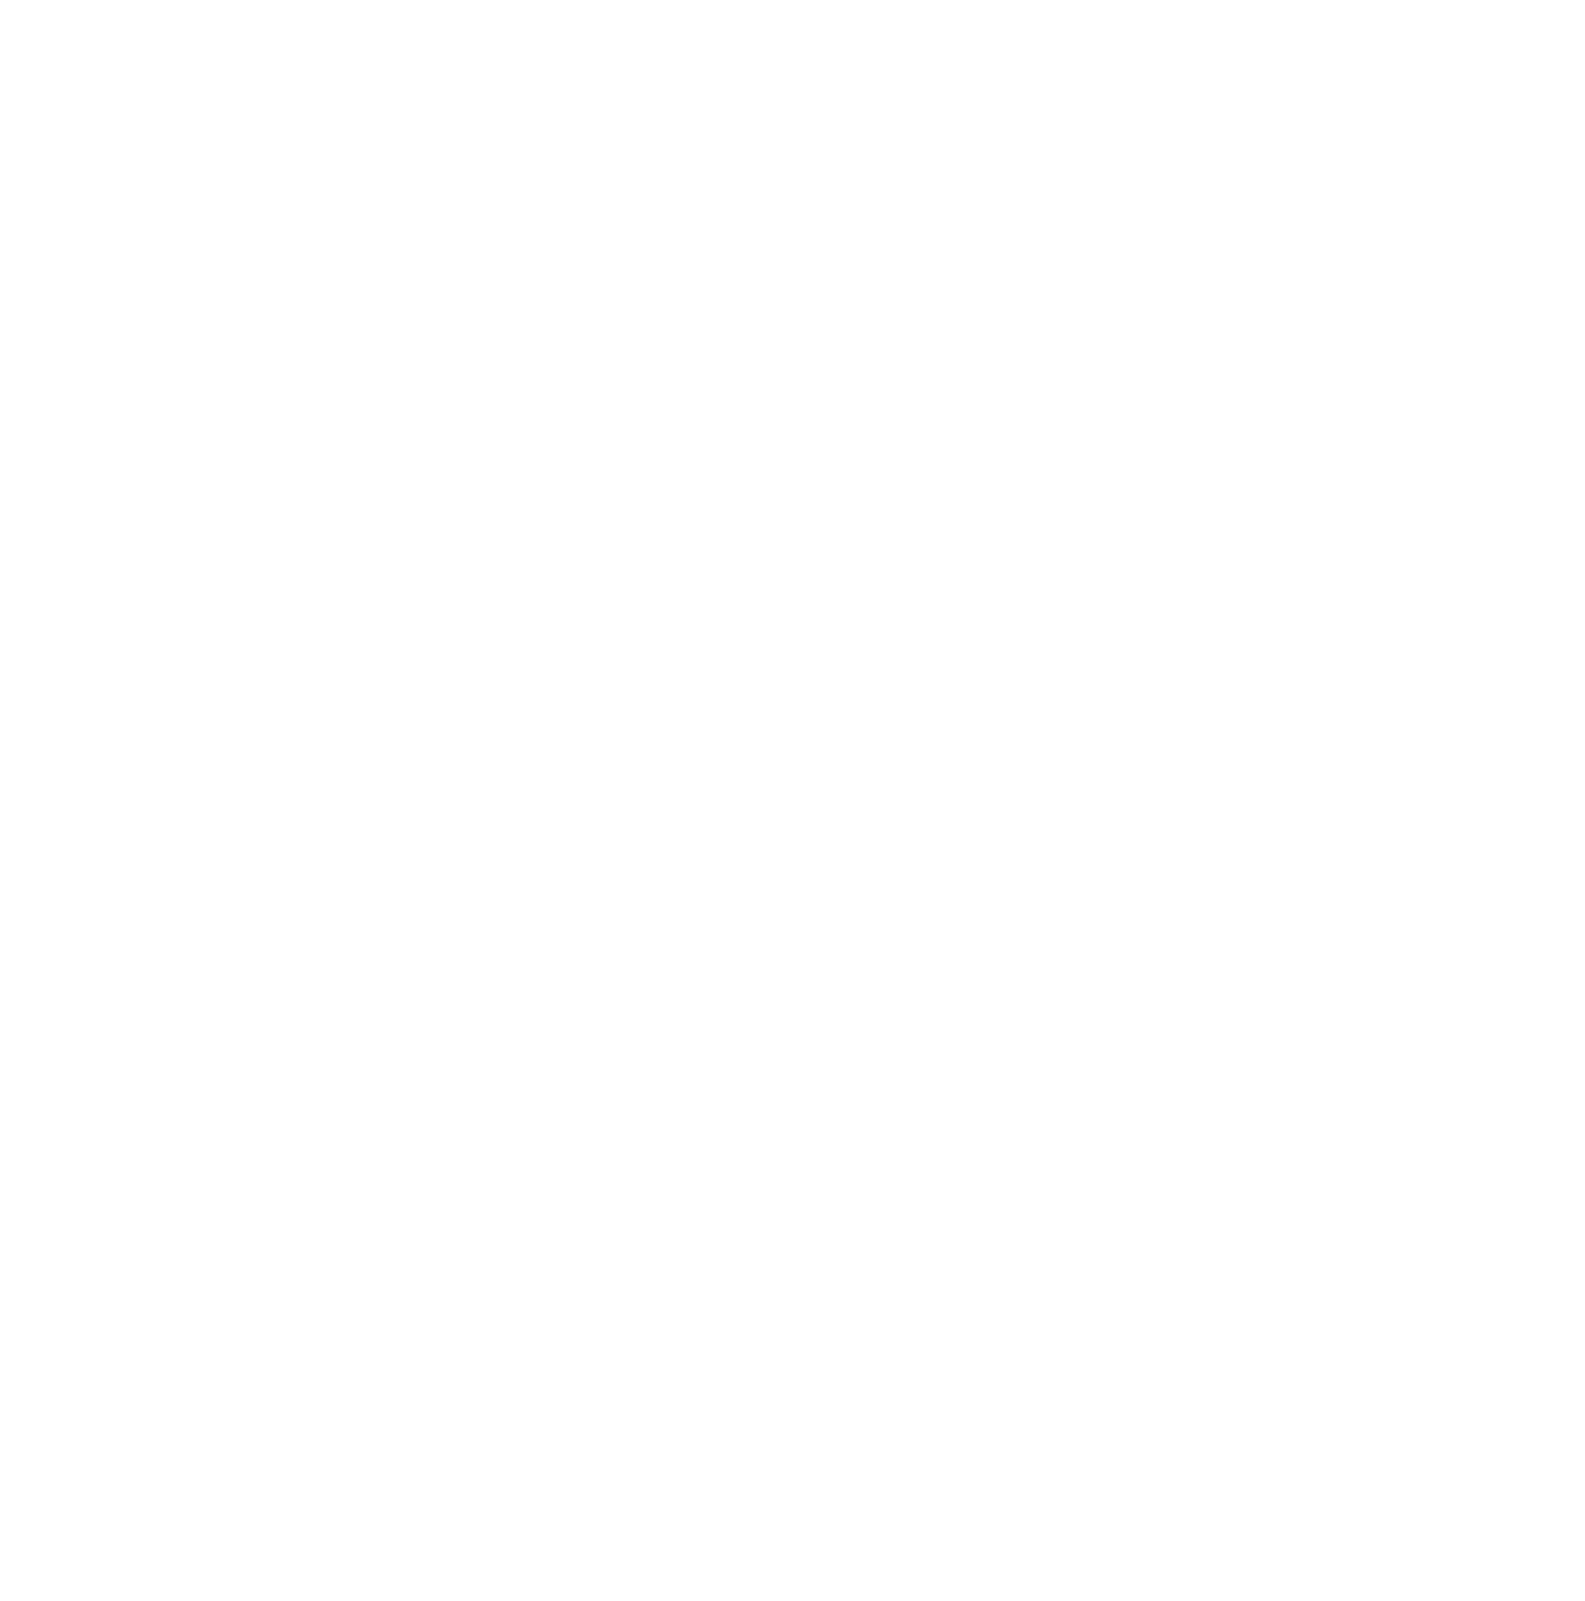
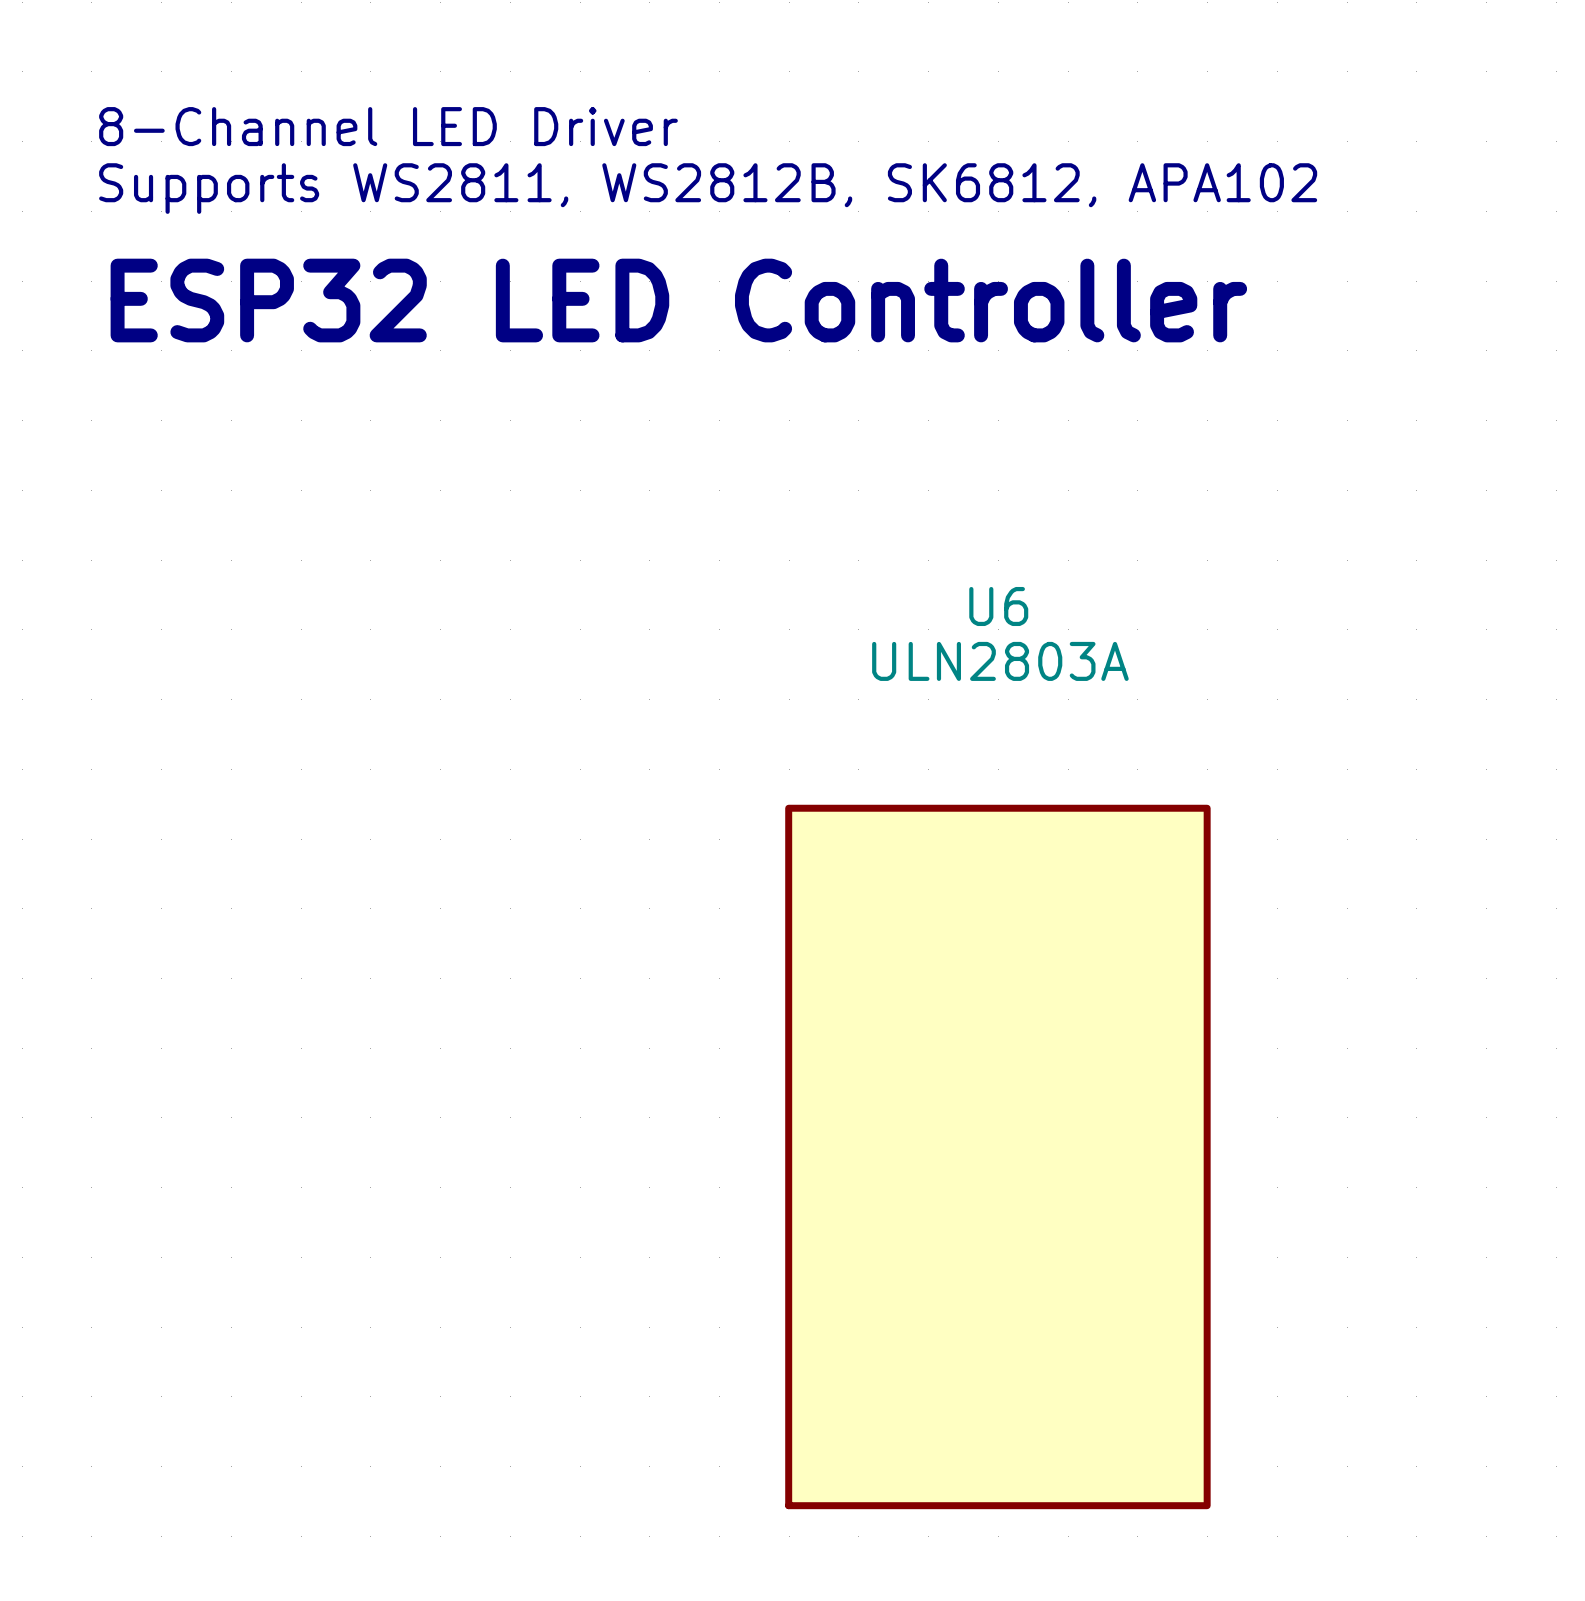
text: none -> 8-Channel LED Driver (388, 126)
text: none -> Supports WS2811, WS2812B, SK6812, APA102 (708, 188)
text: none -> ESP32 LED Controller (678, 300)
U6: none -> ULN2803A (997, 1156)

